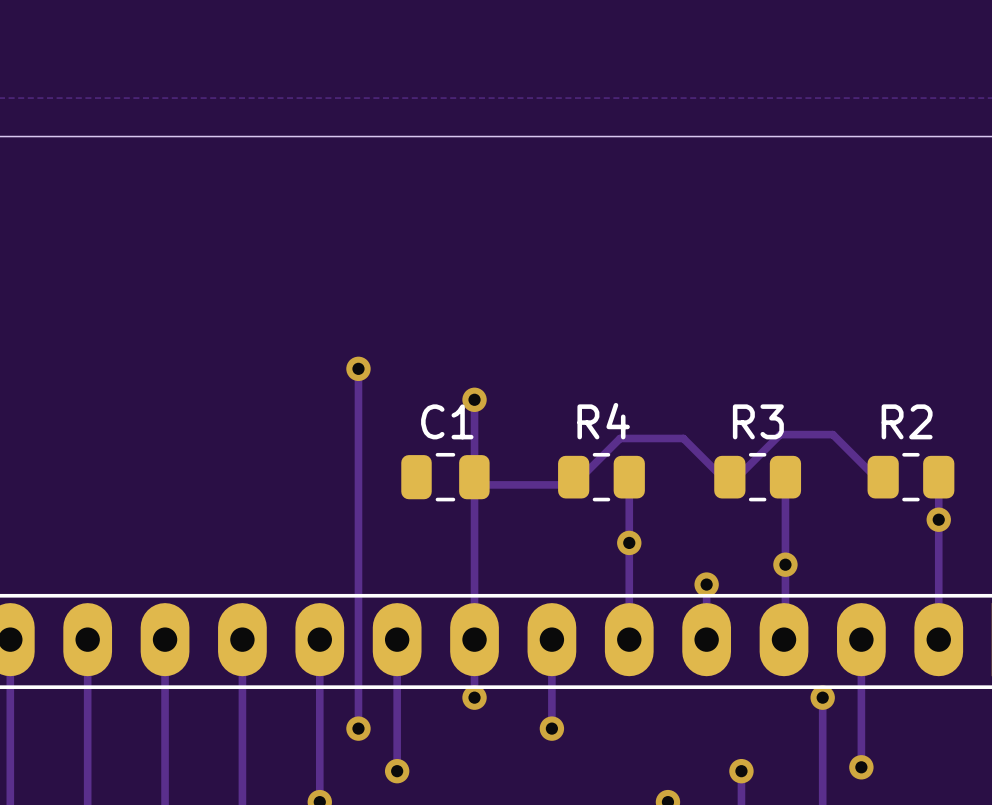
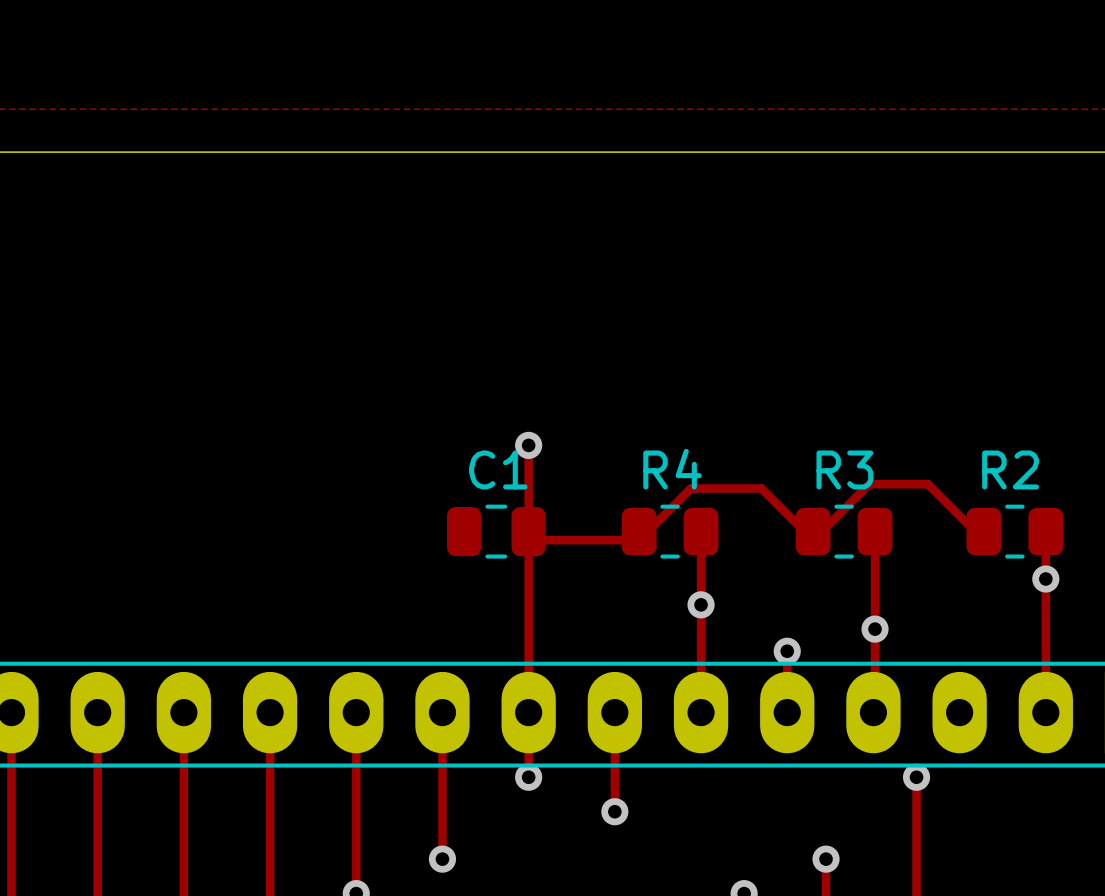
track: (358, 368) (358, 728) -> none
via: (358, 368) -> none
track: (861, 639) (861, 767) -> none
via: (358, 728) -> none
via: (861, 767) -> none

